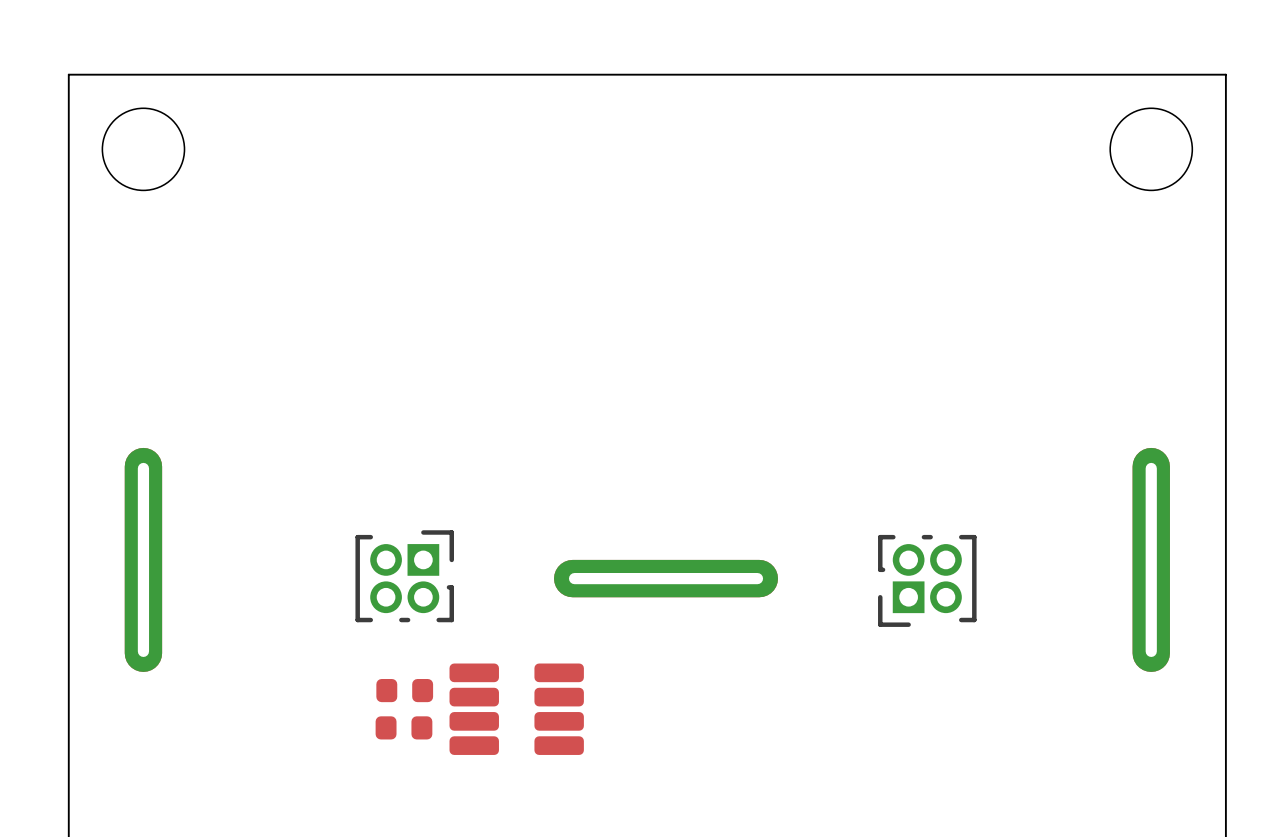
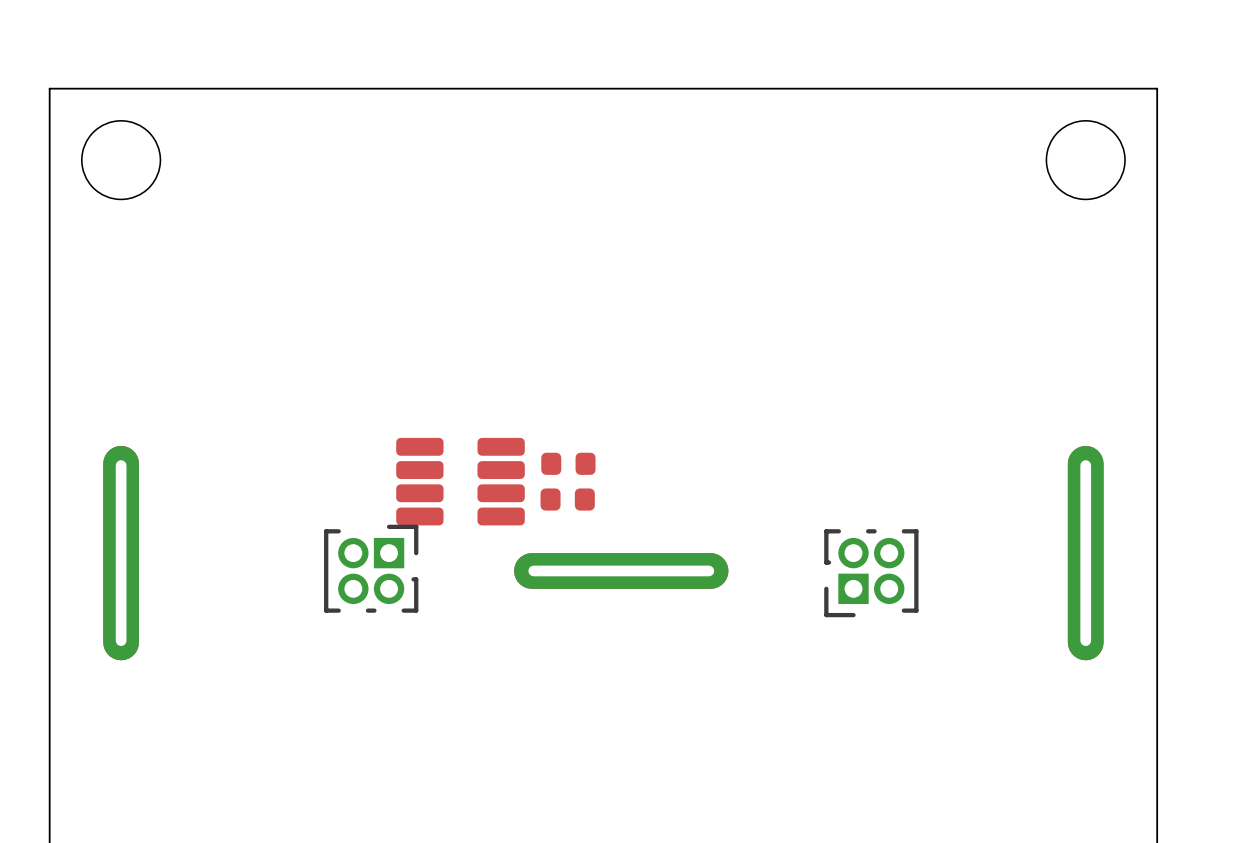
part: none -> (568, 463)
part: none -> (567, 499)
part: (404, 690) -> none
part position: (516, 709) -> (460, 481)
part: (403, 727) -> none

